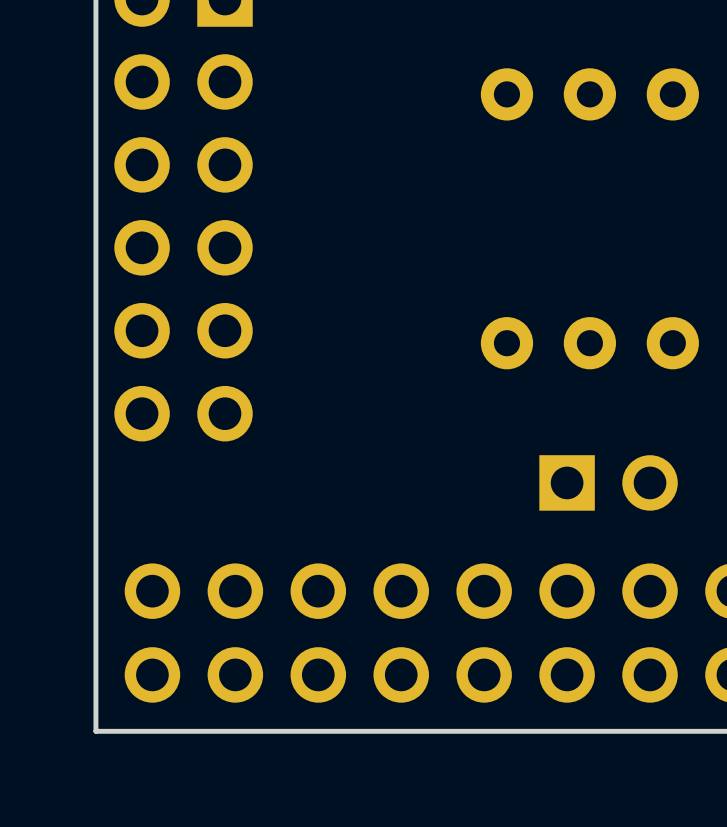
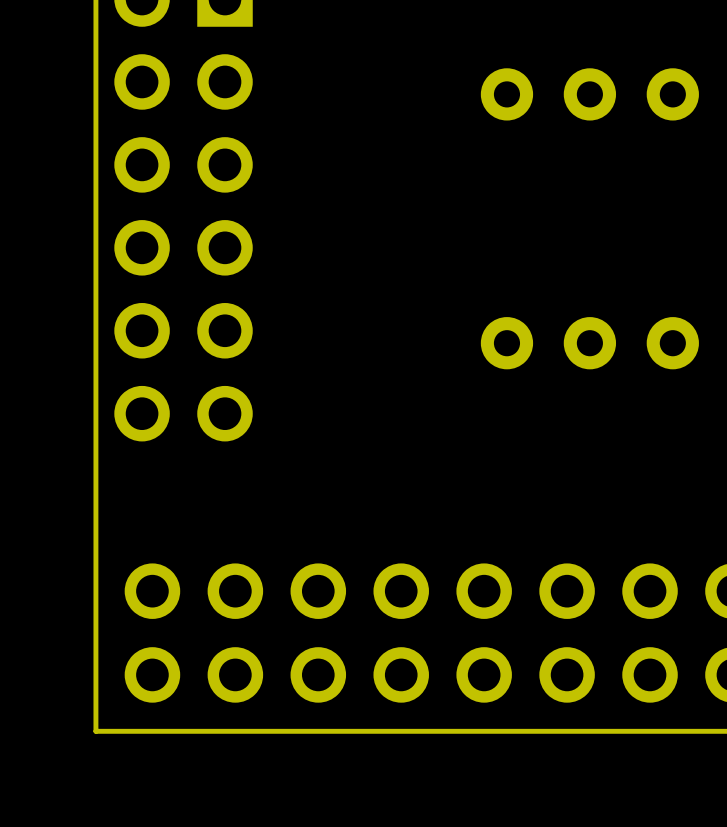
part: (608, 482) -> none

